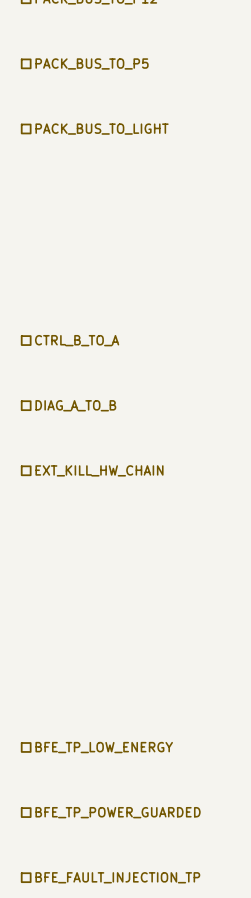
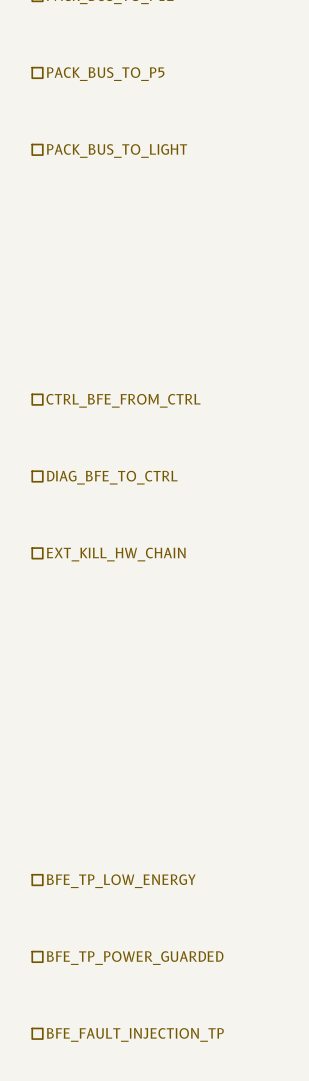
hierarchical label: CTRL_B_TO_A (77, 340) -> CTRL_BFE_FROM_CTRL (123, 400)
hierarchical label: DIAG_A_TO_B (75, 405) -> DIAG_BFE_TO_CTRL (112, 477)

